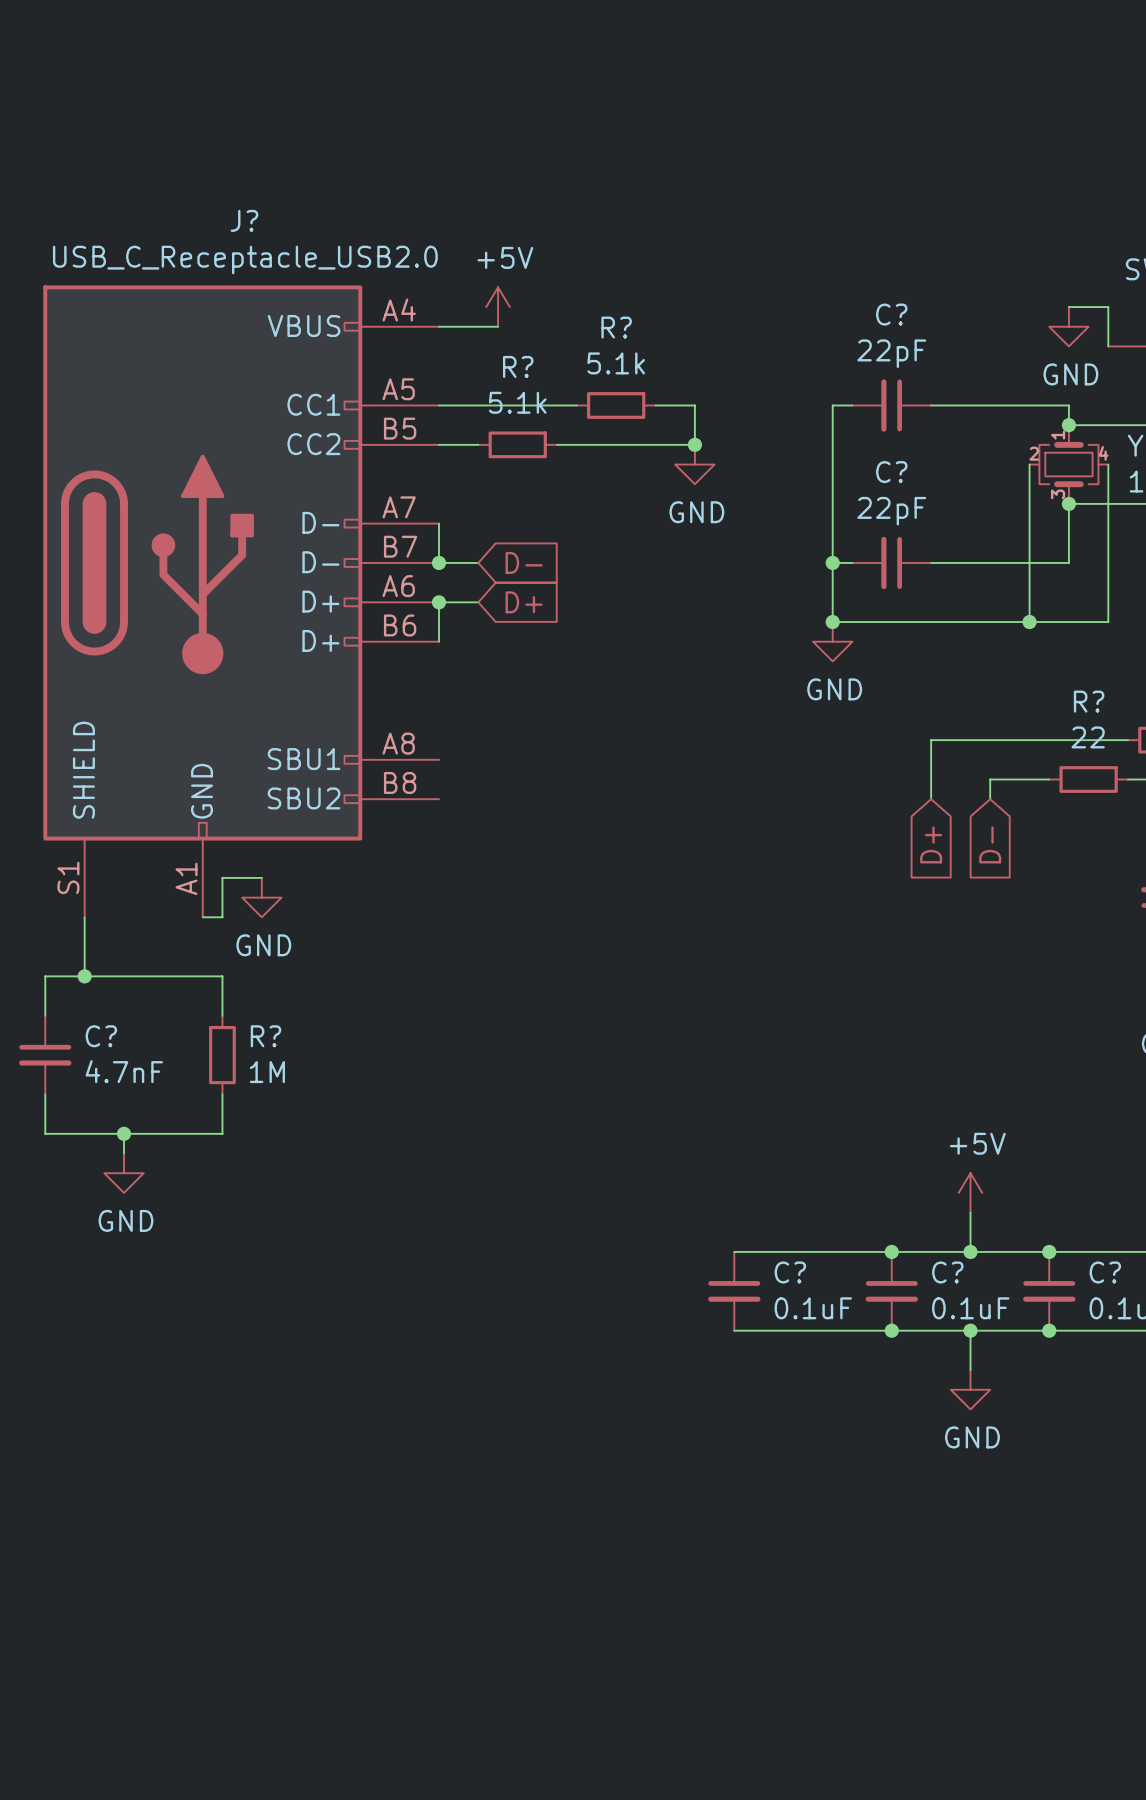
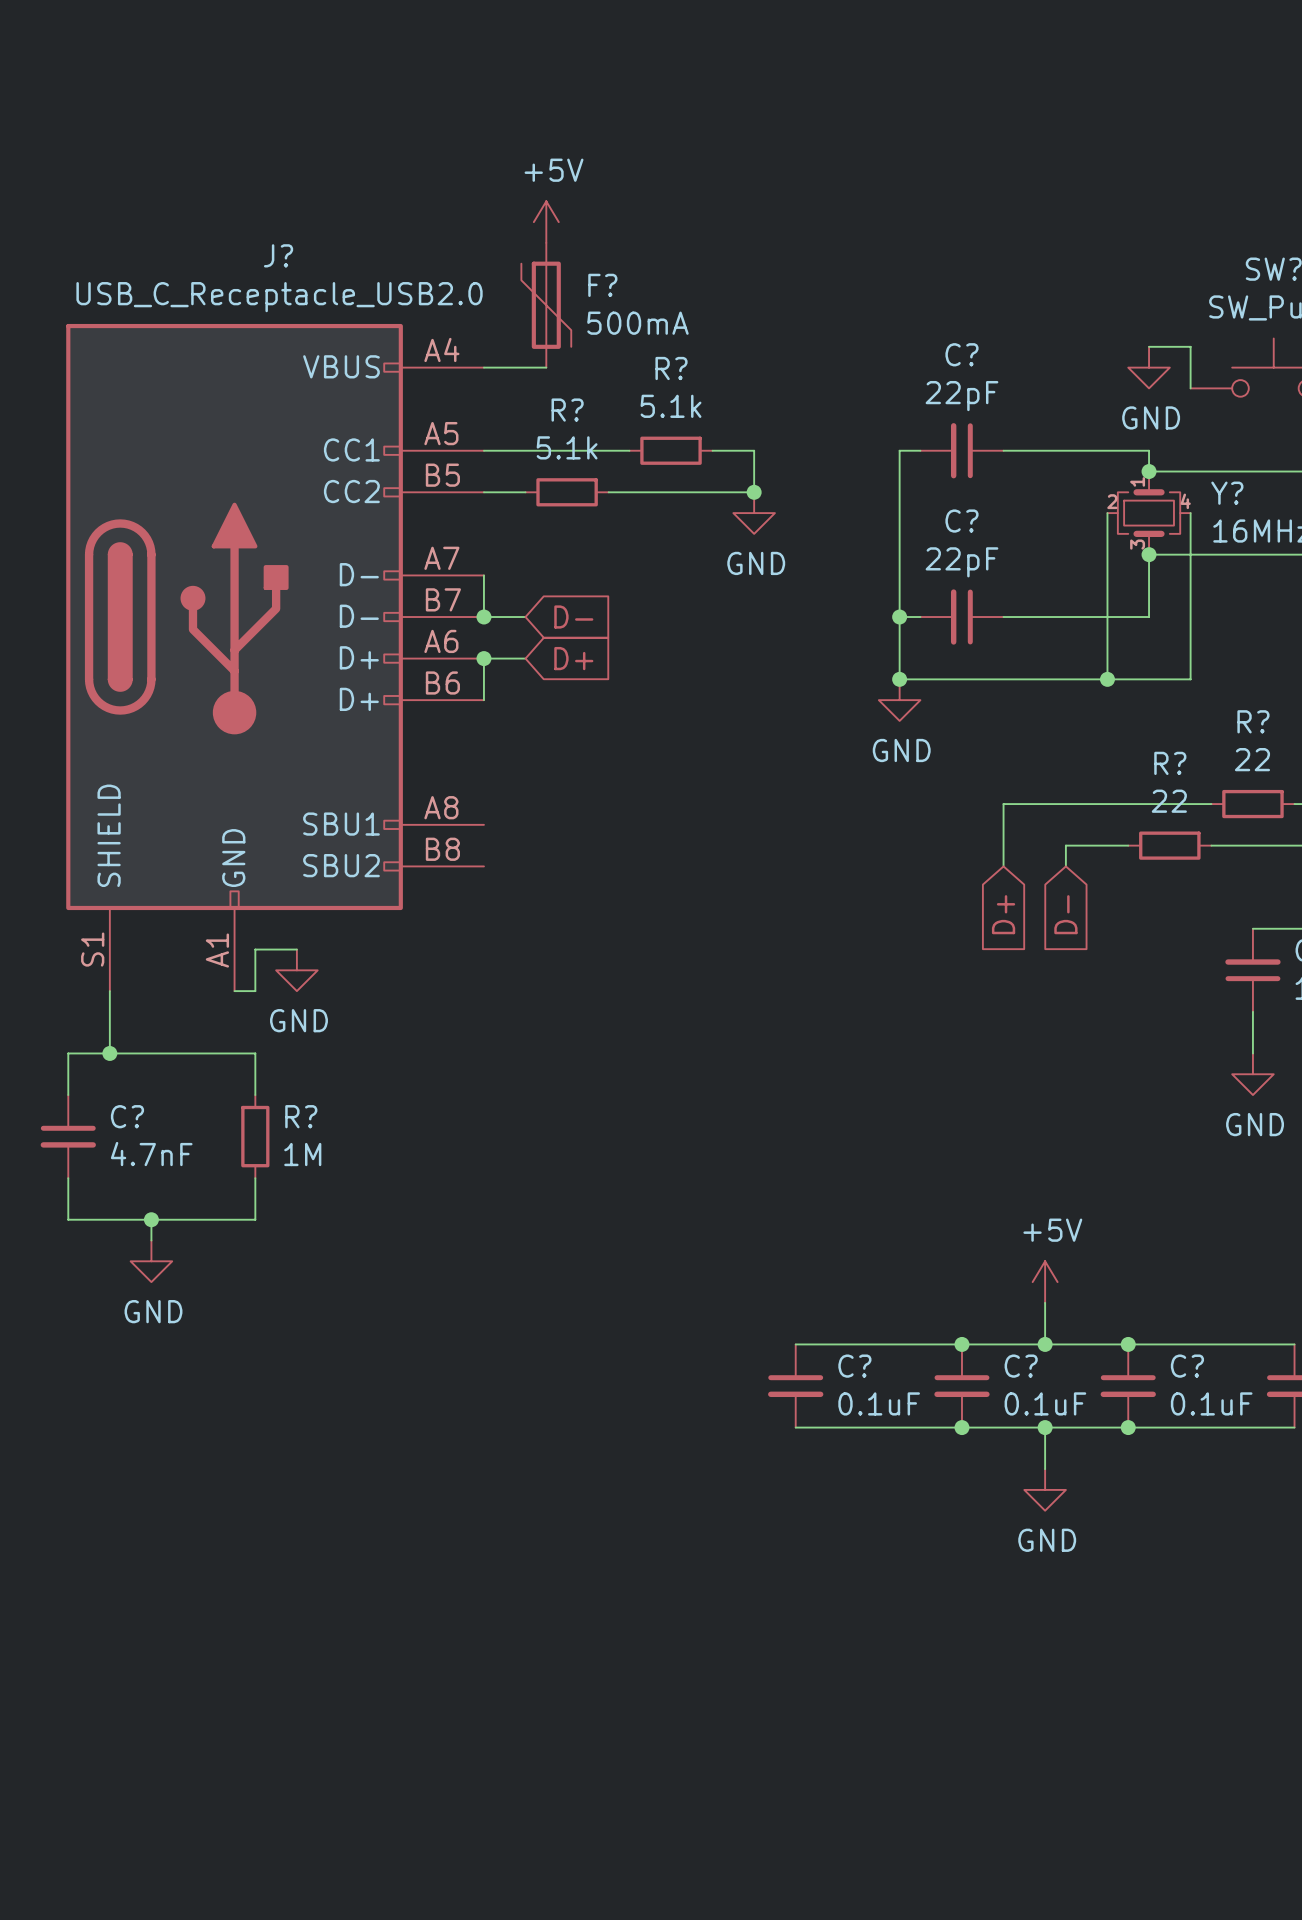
F?: none -> 500mA (546, 305)
power symbol position: +5V (498, 307) -> +5V (546, 222)

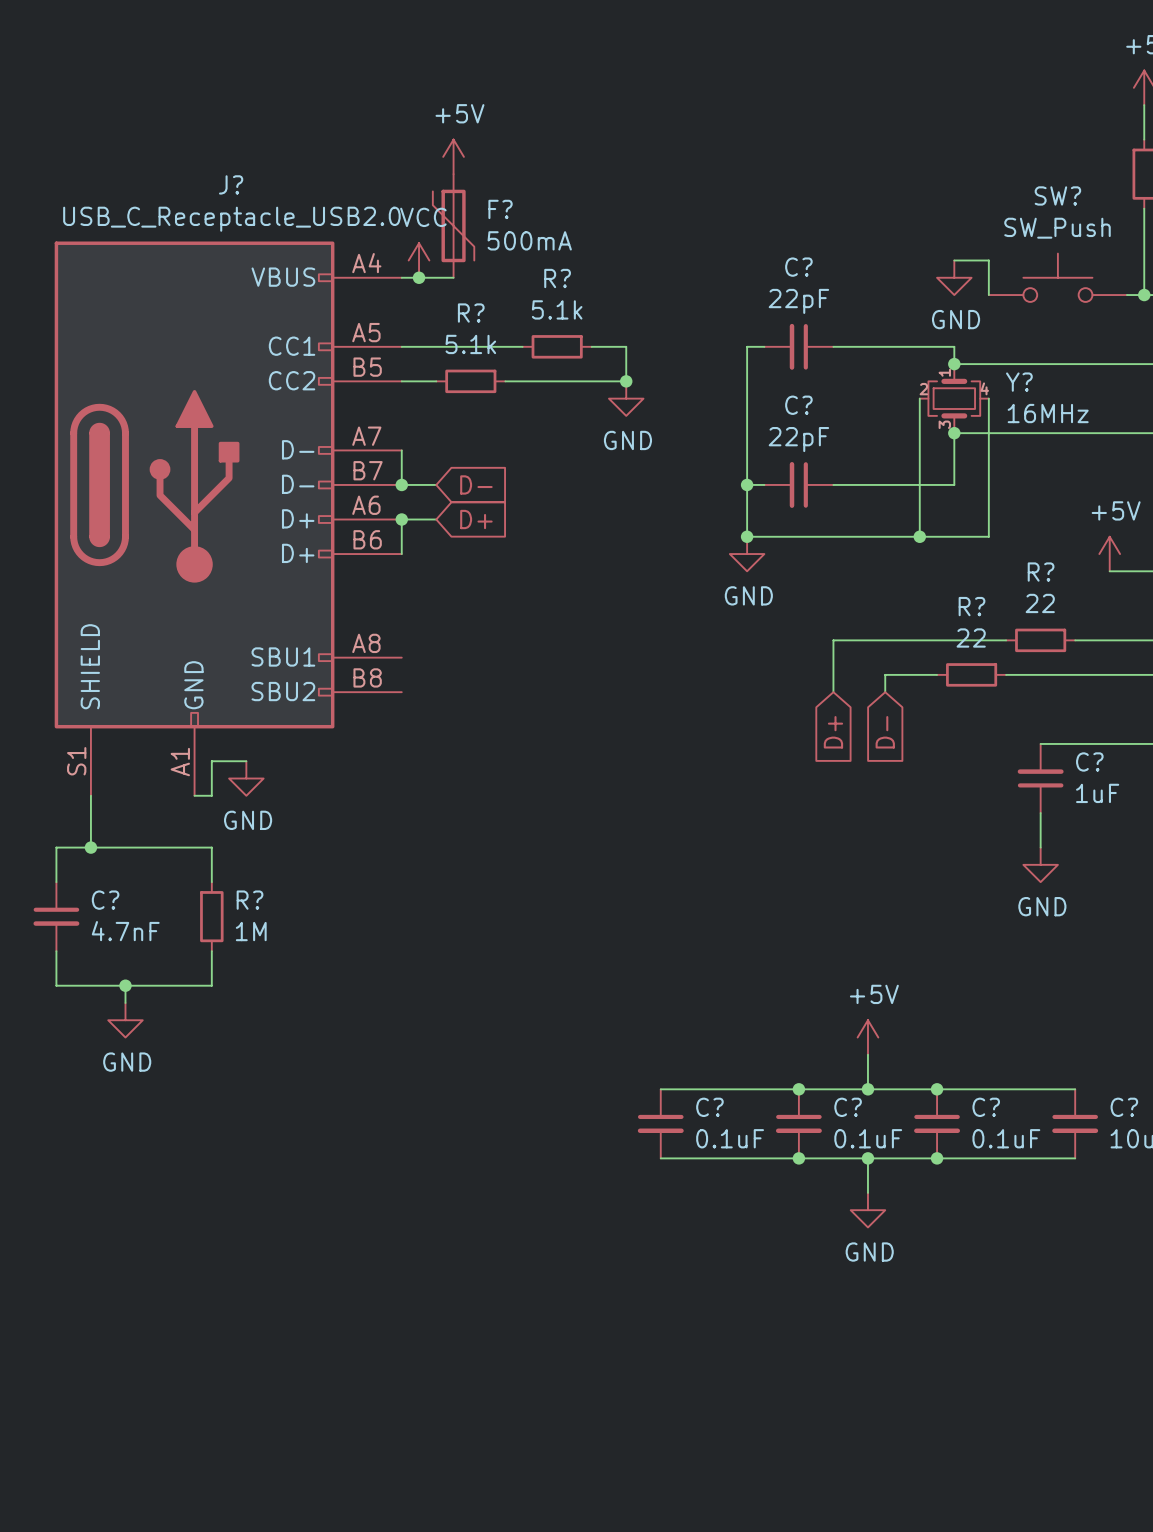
power symbol: none -> VCC (419, 260)
junction: none -> (419, 277)

